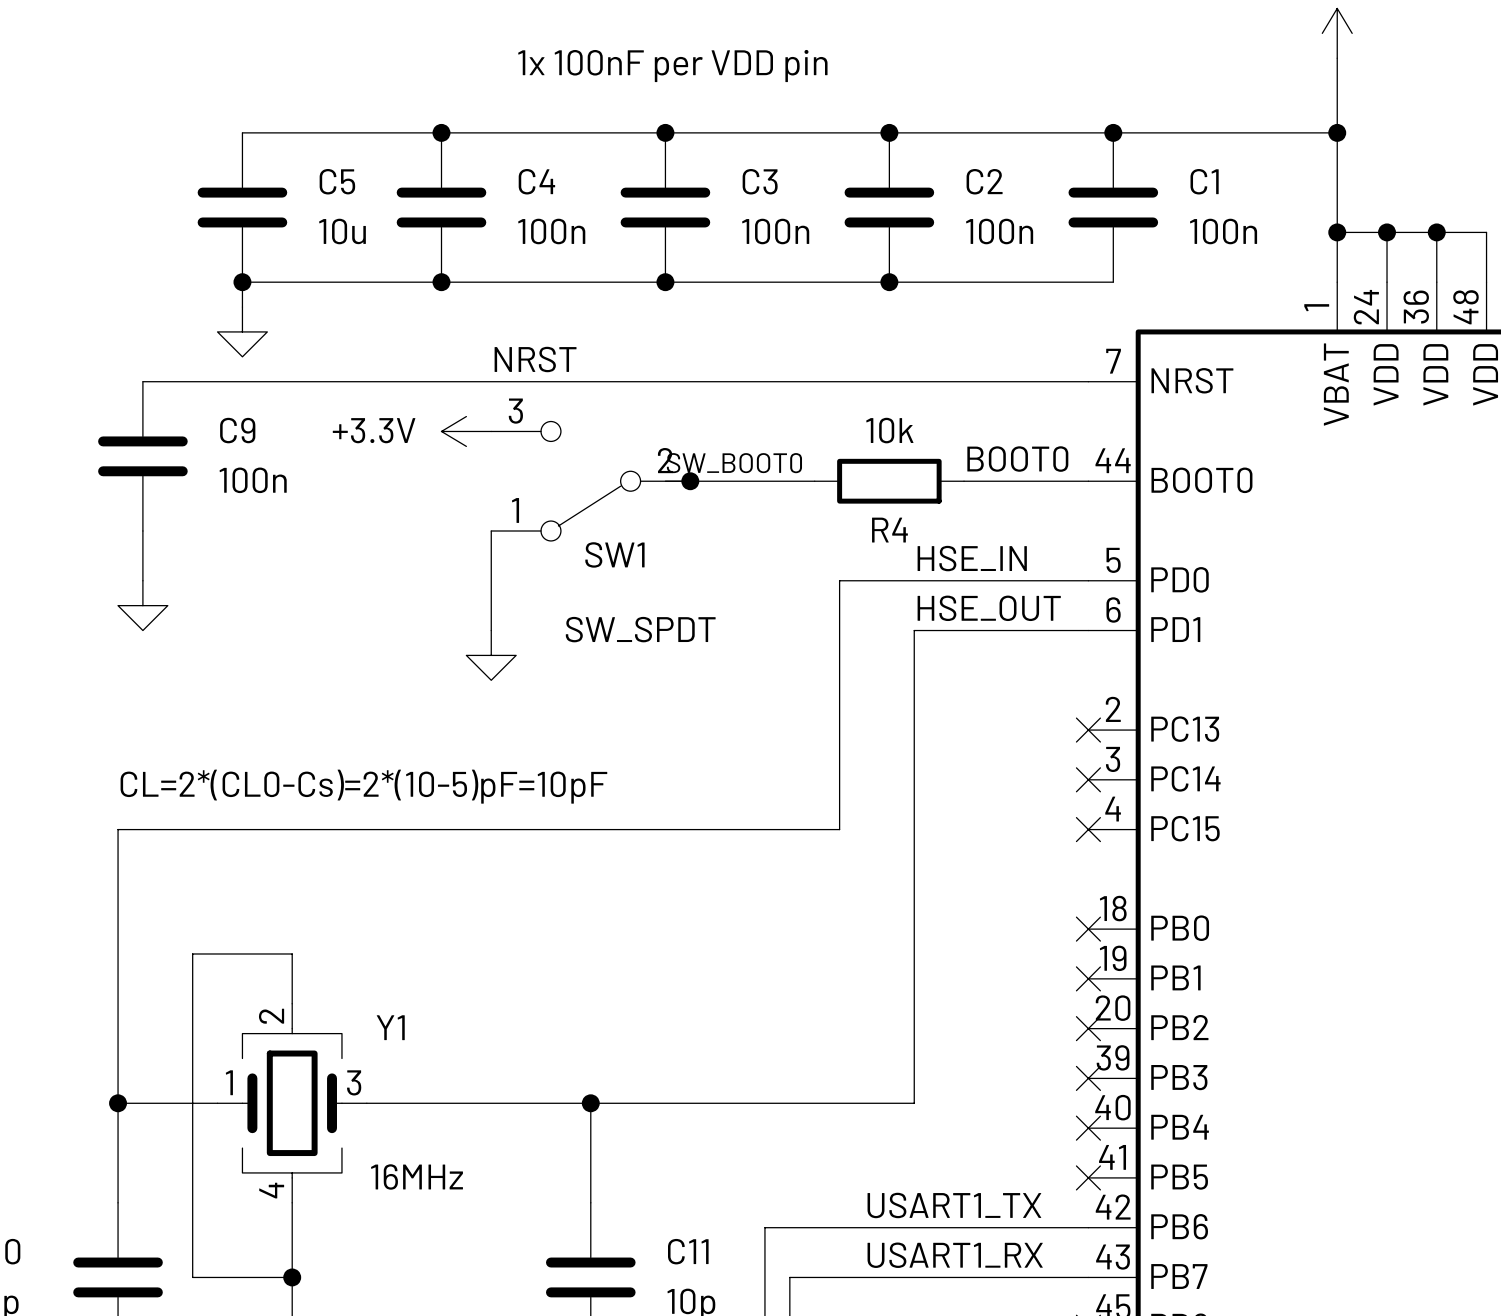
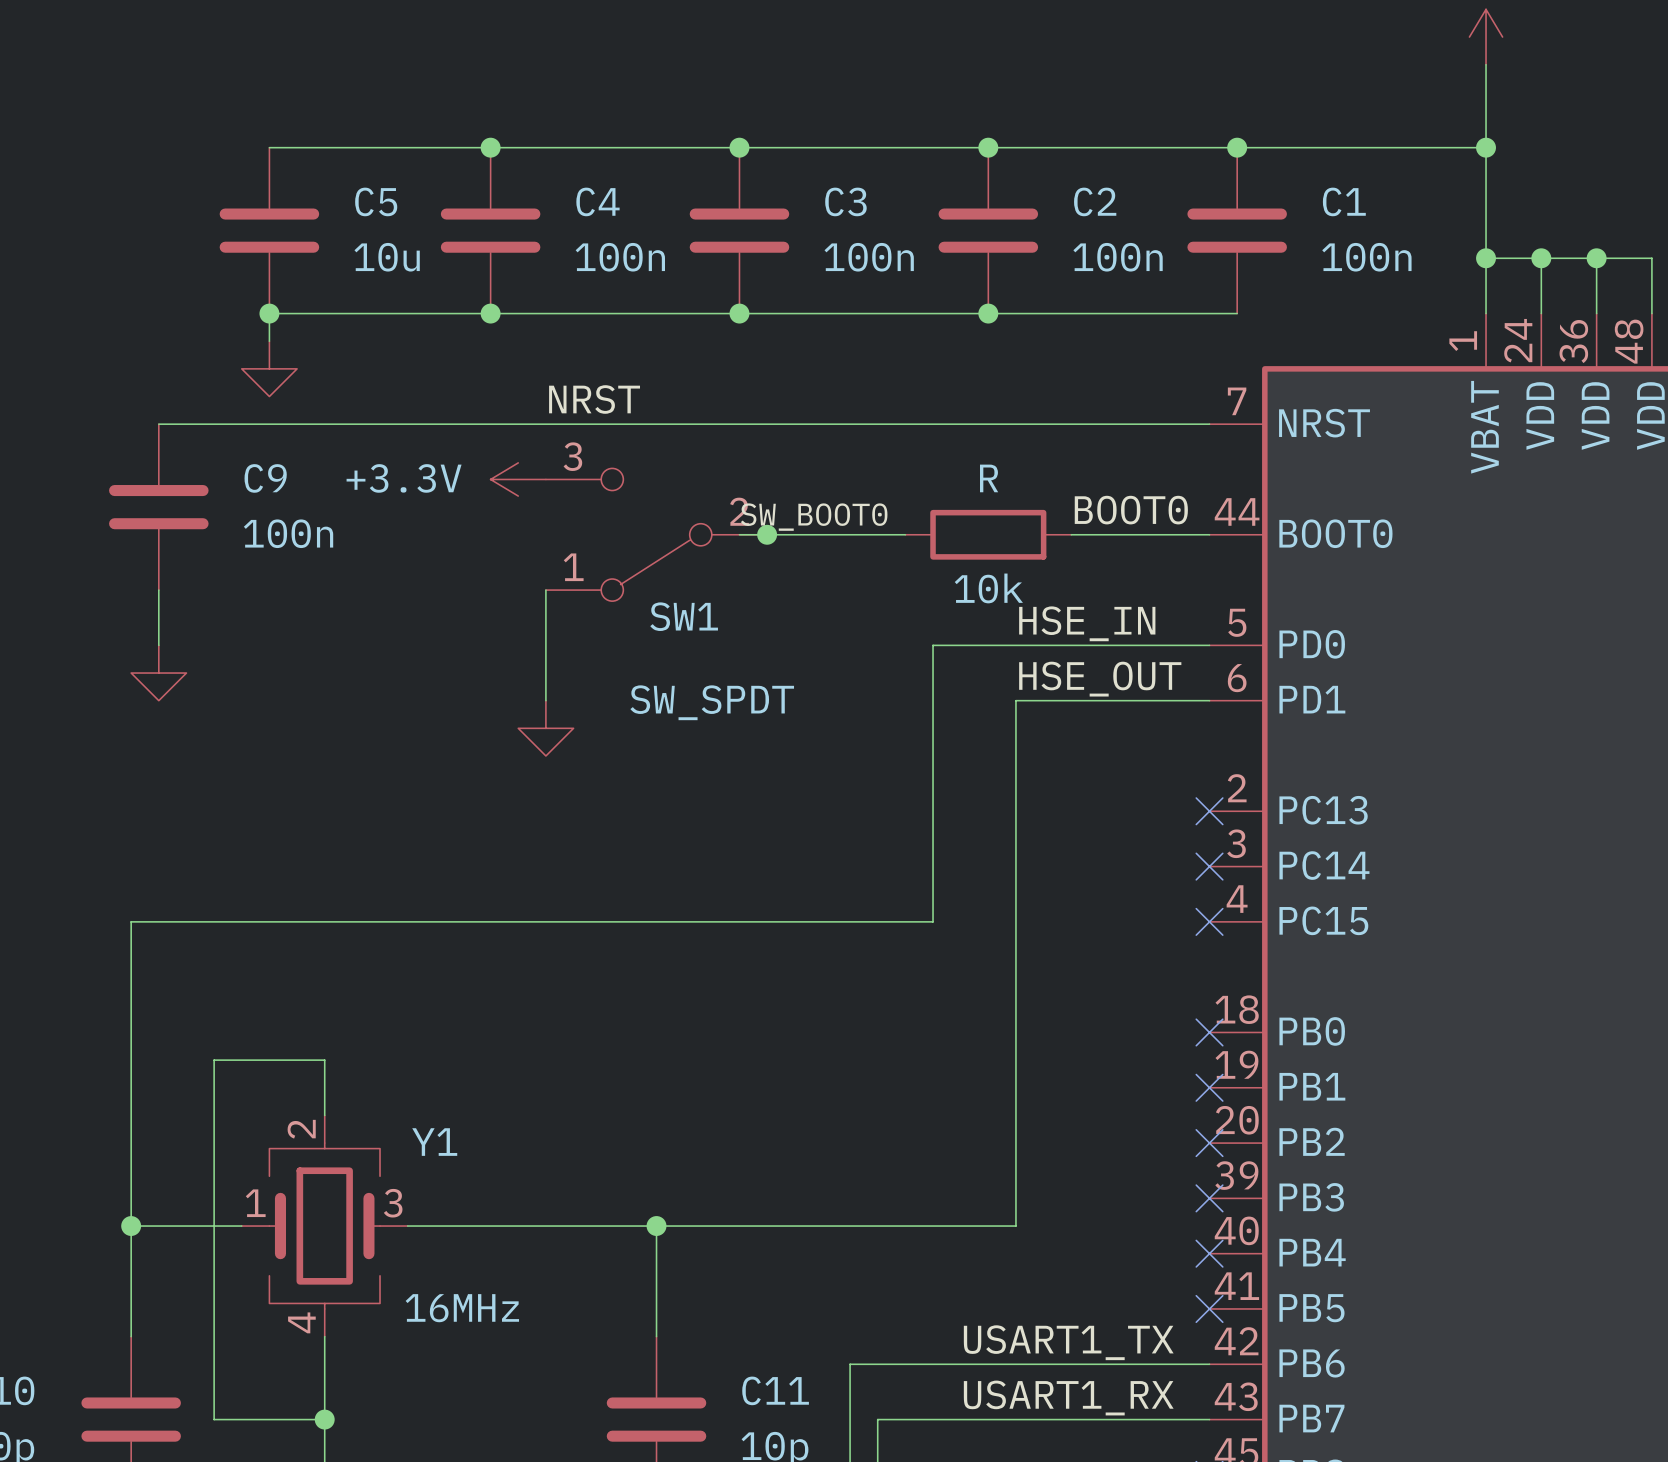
text: 1x 100nF per VDD pin (672, 66) -> none
R4 value: 10k (889, 430) -> R (989, 478)
R4 name: R4 (889, 530) -> 10k (988, 588)
text: CL=2*(CL0-Cs)=2*(10-5)pF=10pF (363, 786) -> none

